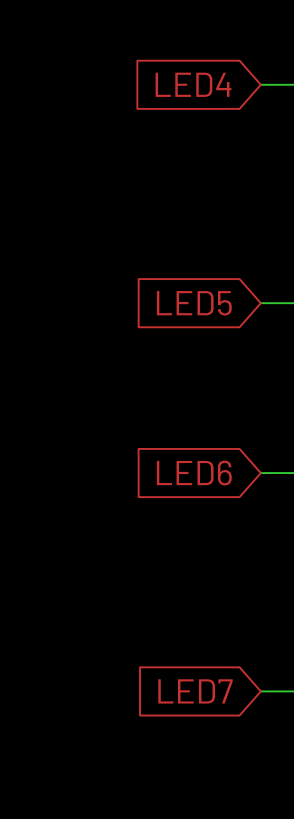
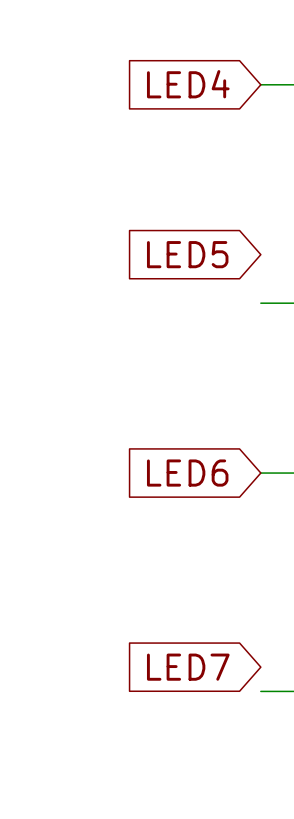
global label position: LED5 (194, 303) -> LED5 (187, 254)
global label position: LED7 (195, 691) -> LED7 (188, 667)

